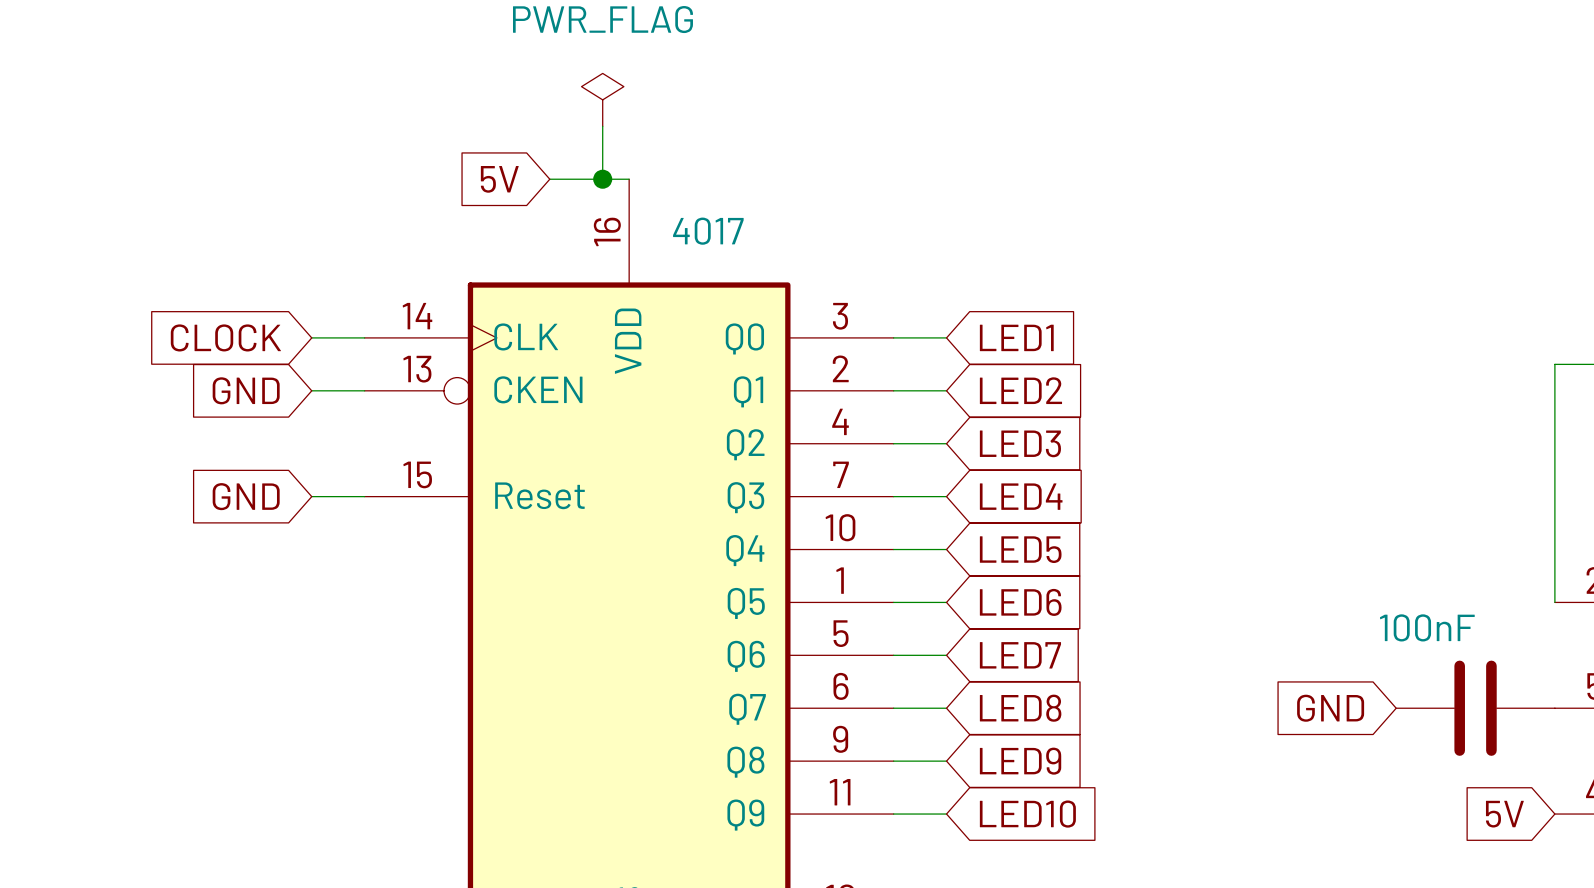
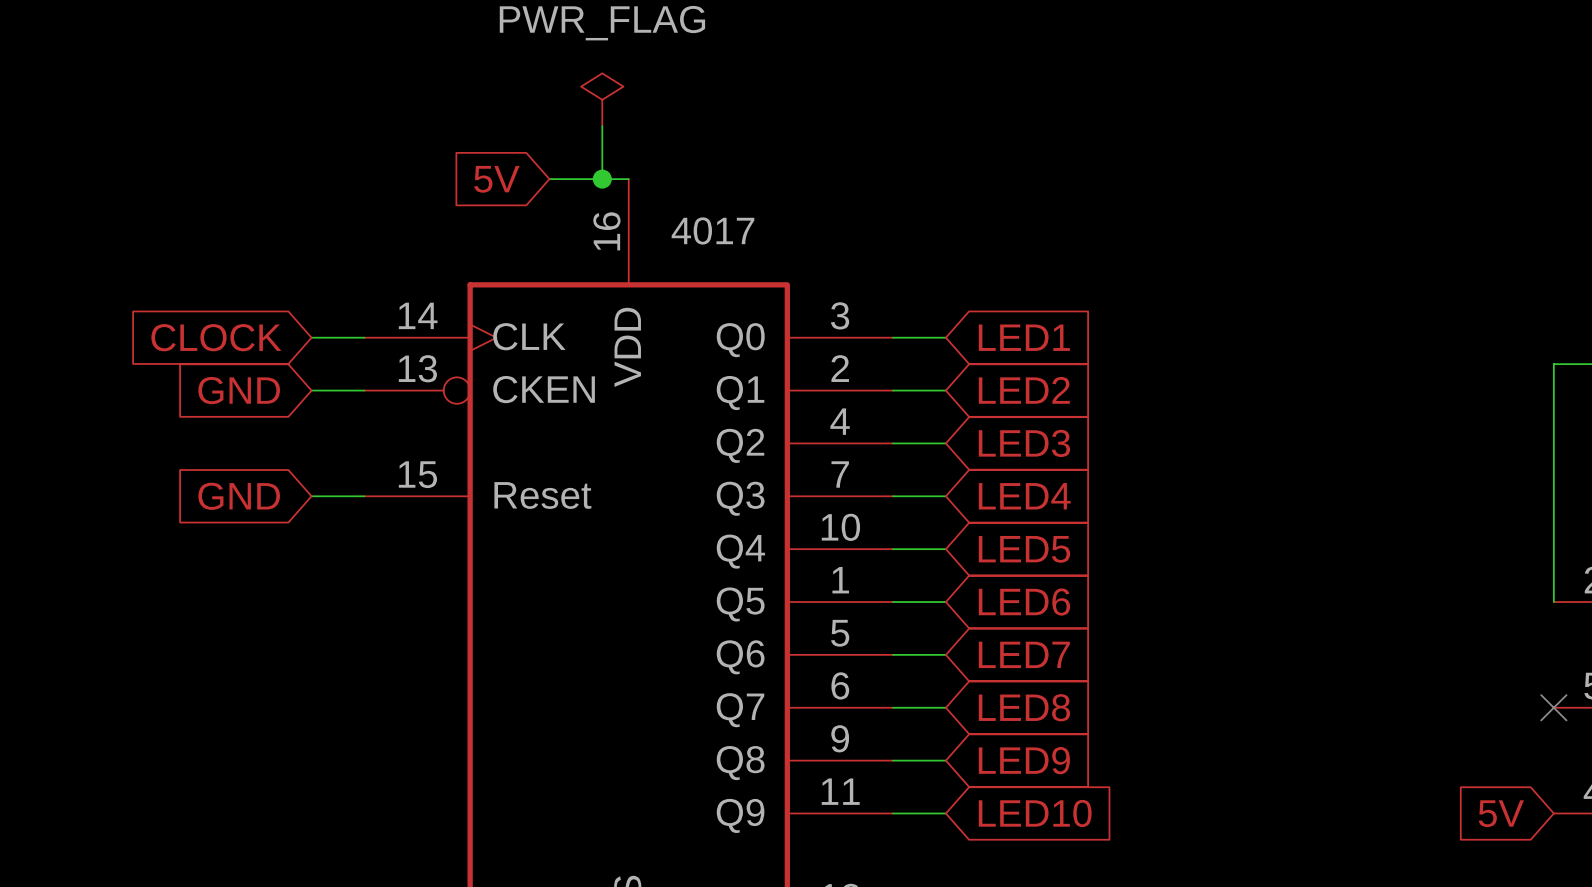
global label: GND (1330, 708) -> none
part: 100nF (1475, 708) -> none
no-connect mark: none -> (1553, 707)

